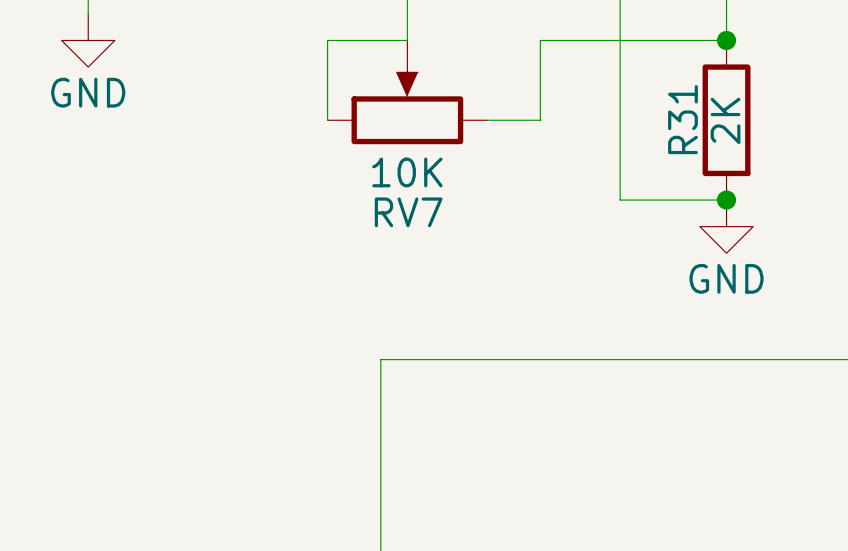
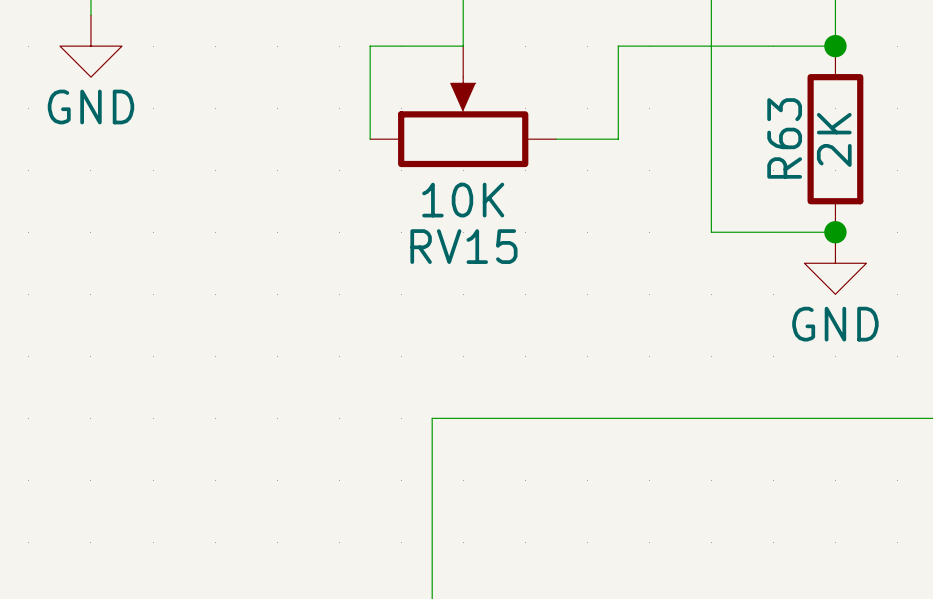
R31 name: R31 (682, 119) -> R63 (784, 138)
RV7 name: RV7 (408, 212) -> RV15 (463, 246)

